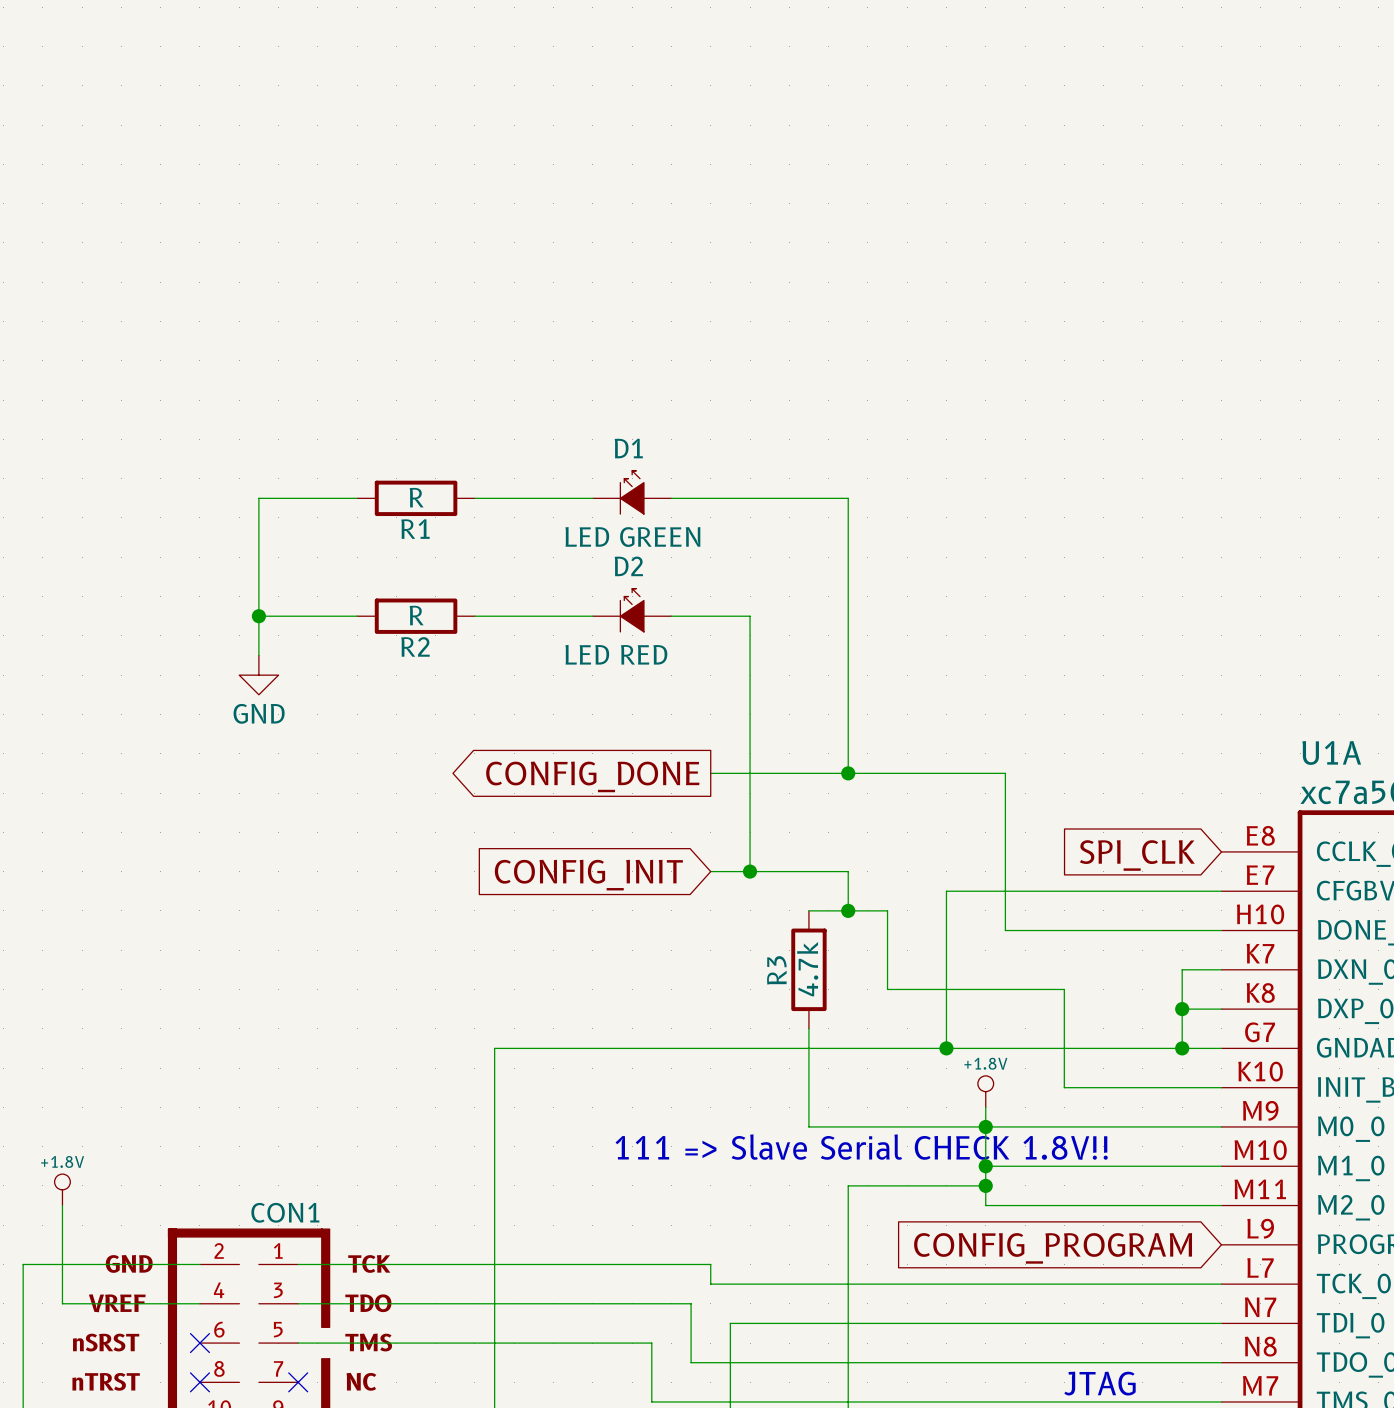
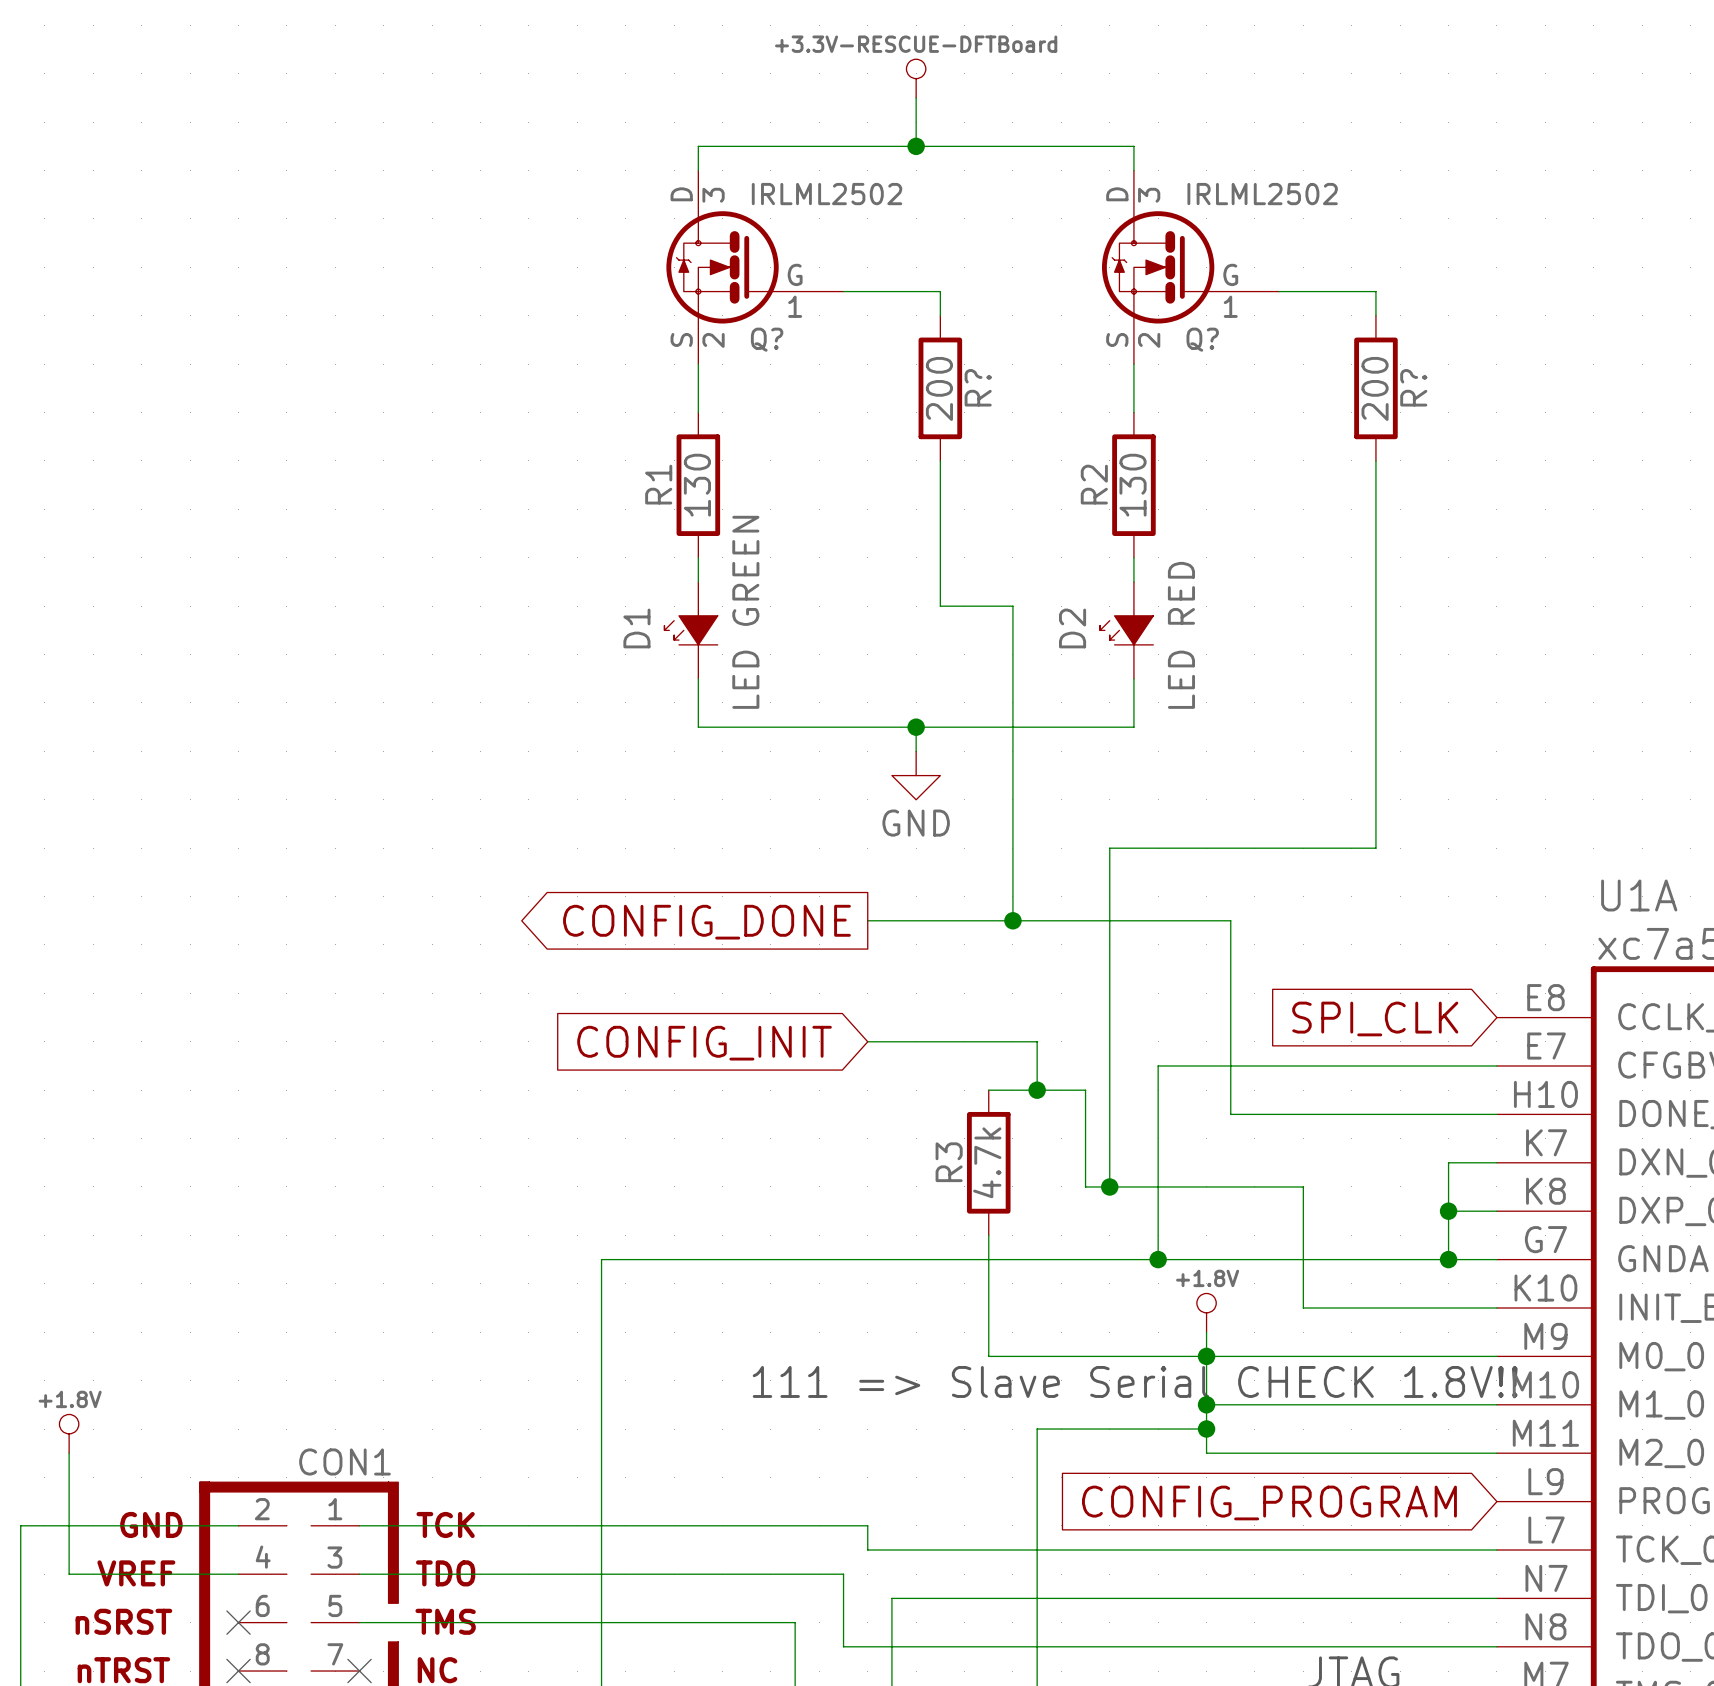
power symbol: none -> +3.3V-RESCUE-DFTBoard (916, 78)
wire: none -> (916, 97) (916, 146)
junction: none -> (916, 146)
wire: none -> (698, 170) (698, 146) (1133, 146) (1133, 170)
Q?: none -> IRLML2502 (754, 267)
Q?: none -> IRLML2502 (1190, 267)
wire: none -> (843, 291) (940, 291) (940, 315)
wire: none -> (1279, 291) (1375, 291) (1375, 315)
wire: none -> (698, 364) (698, 412)
wire: none -> (1133, 364) (1133, 412)
R?: none -> 200 (940, 388)
R?: none -> 200 (1375, 388)
wire: none -> (940, 460) (940, 606) (1012, 606) (1012, 920)
wire: none -> (1375, 460) (1375, 848) (1109, 848) (1109, 1186)
wire: none -> (698, 557) (698, 581)
wire: none -> (1133, 557) (1133, 581)
D1 rotation: 0° (632, 492) -> 90° counterclockwise (691, 630)
D1 position: (632, 492) -> (691, 630)
R1 value: R (416, 497) -> 130 (697, 485)
wire: (357, 498) (258, 498) (258, 655) -> none
R1 rotation: 0° (416, 498) -> 90° clockwise (698, 485)
R1 position: (416, 498) -> (698, 485)
wire: (474, 498) (592, 498) -> none
wire: (671, 498) (848, 498) (848, 773) -> none
wire: none -> (1133, 678) (1133, 727) (916, 727)
D2 rotation: 0° (632, 610) -> 90° counterclockwise (1126, 630)
D2 position: (632, 610) -> (1126, 630)
R2 value: R (416, 615) -> 130 (1133, 485)
wire: (258, 616) (357, 616) -> none
junction: (258, 616) -> none
R2 rotation: 0° (416, 616) -> 90° clockwise (1133, 485)
R2 position: (416, 616) -> (1133, 485)
wire: (474, 616) (573, 616) -> (698, 678) (698, 727)
junction: none -> (916, 727)
wire: (750, 635) (750, 871) -> none
power symbol: none -> GND (916, 775)
power symbol: GND (258, 675) -> none
junction position: (848, 773) -> (1012, 920)
junction: (750, 871) -> none
junction: none -> (1109, 1186)

